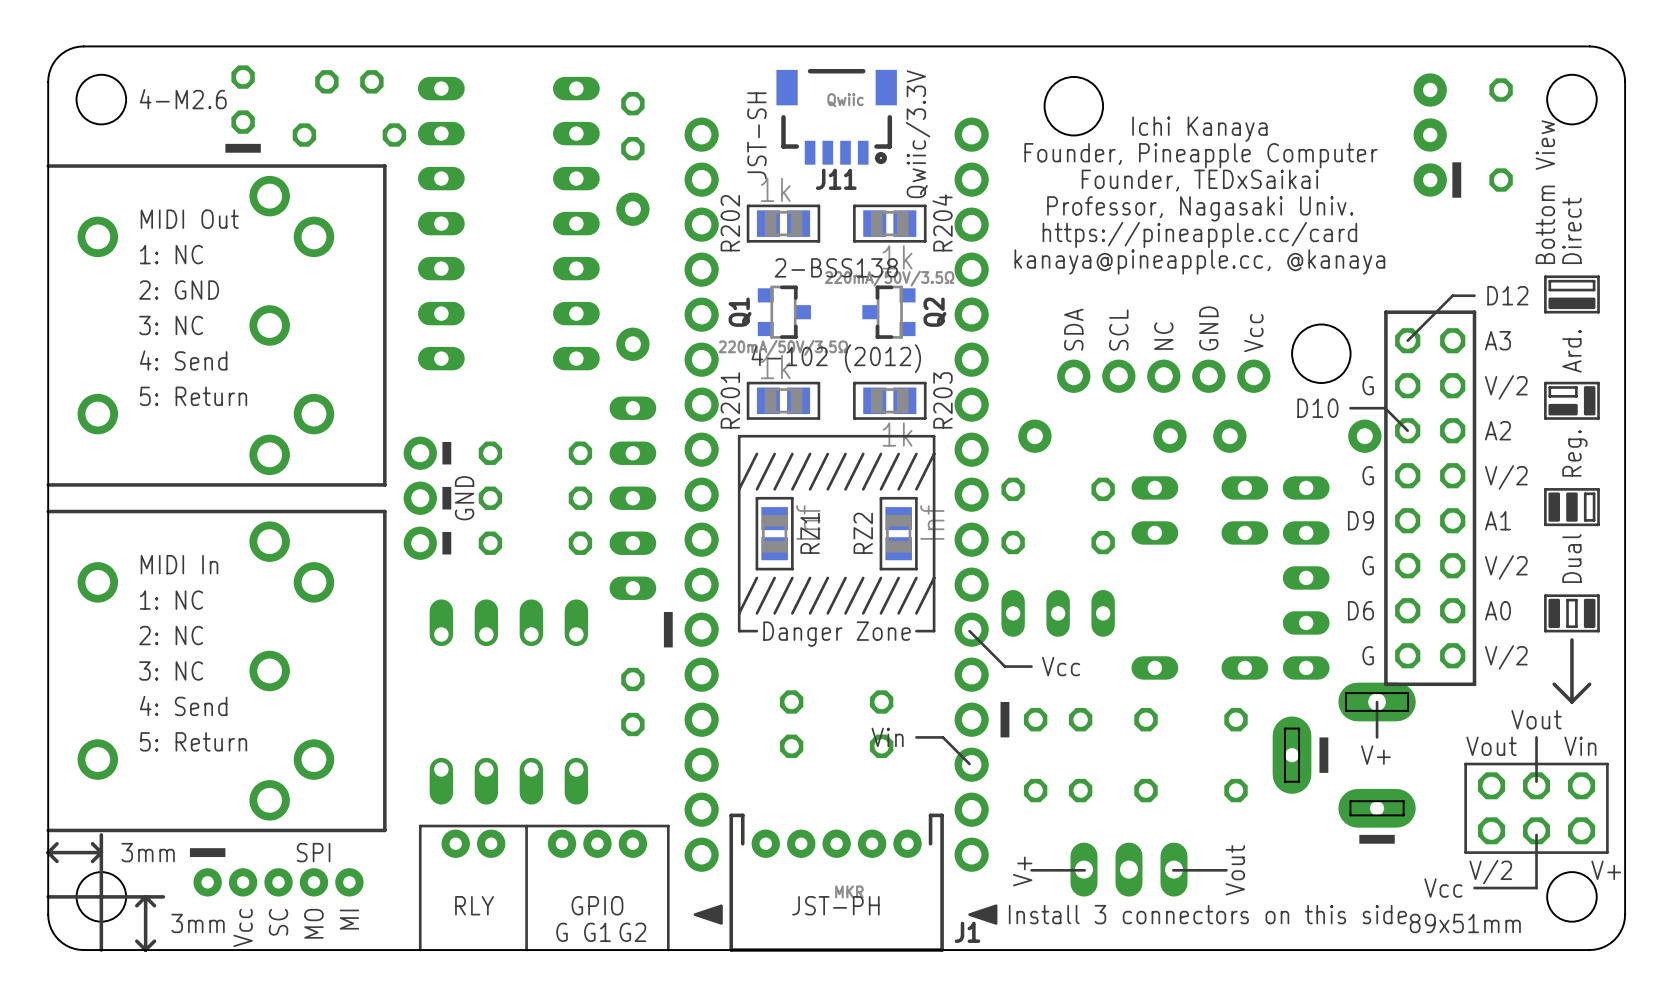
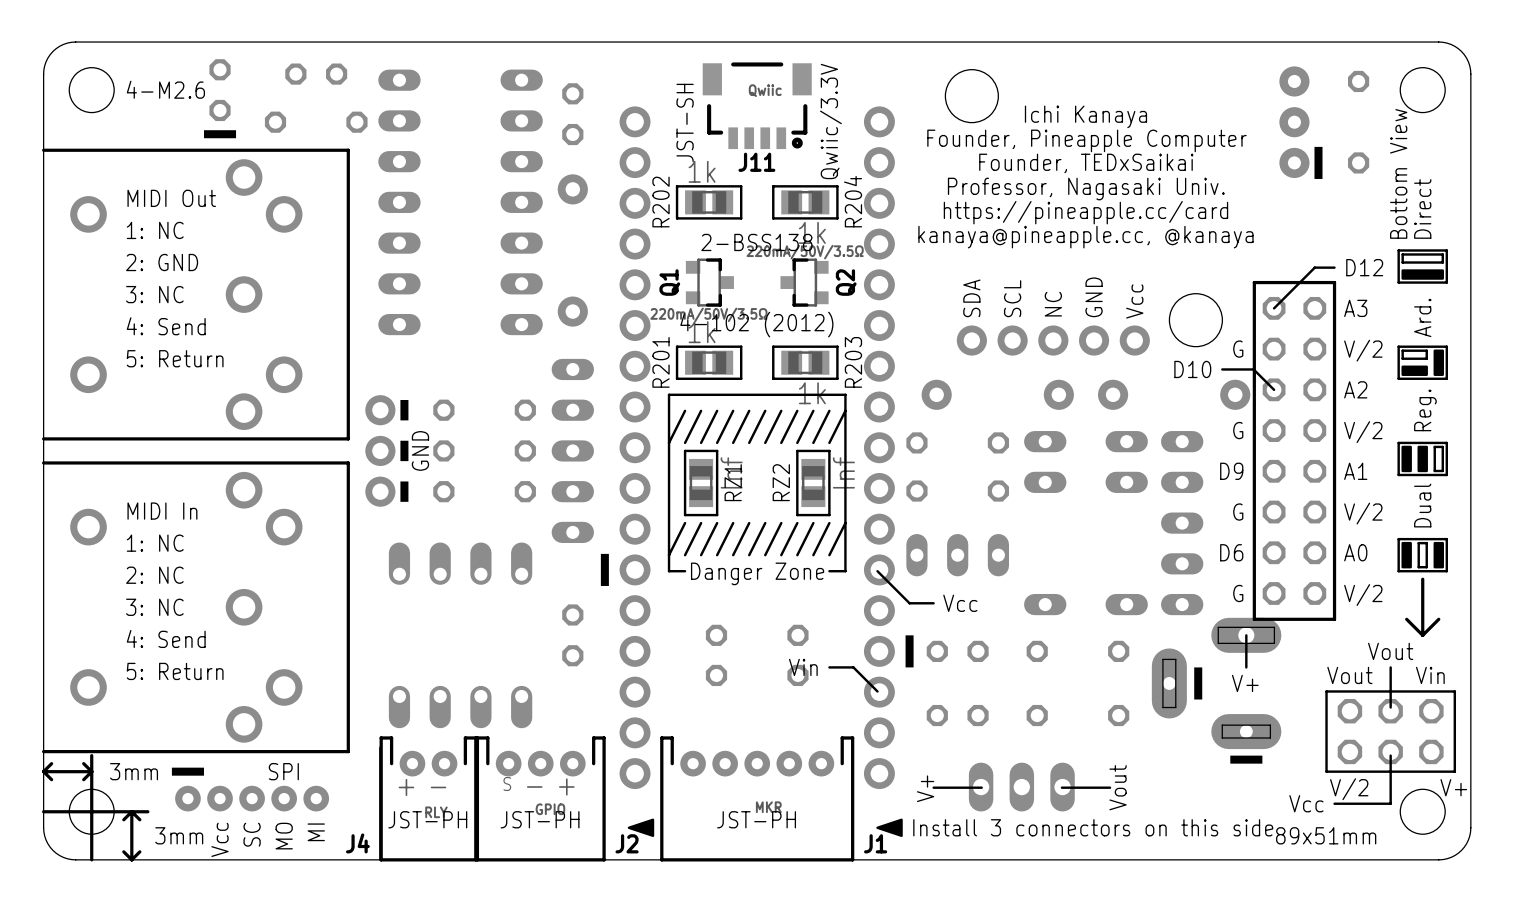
line: (420, 826) (668, 826) (668, 950) -> none
line: (526, 826) (526, 950) -> none
J4 side: top (473, 843) -> bottom (428, 798)
J2 side: top (597, 843) -> bottom (540, 798)
text: RLY (474, 905) -> JST-PH (427, 819)
text: GPIO (597, 905) -> JST-PH (540, 819)
text: G (562, 932) -> none
text: G1 (597, 932) -> none
text: G2 (632, 932) -> none

